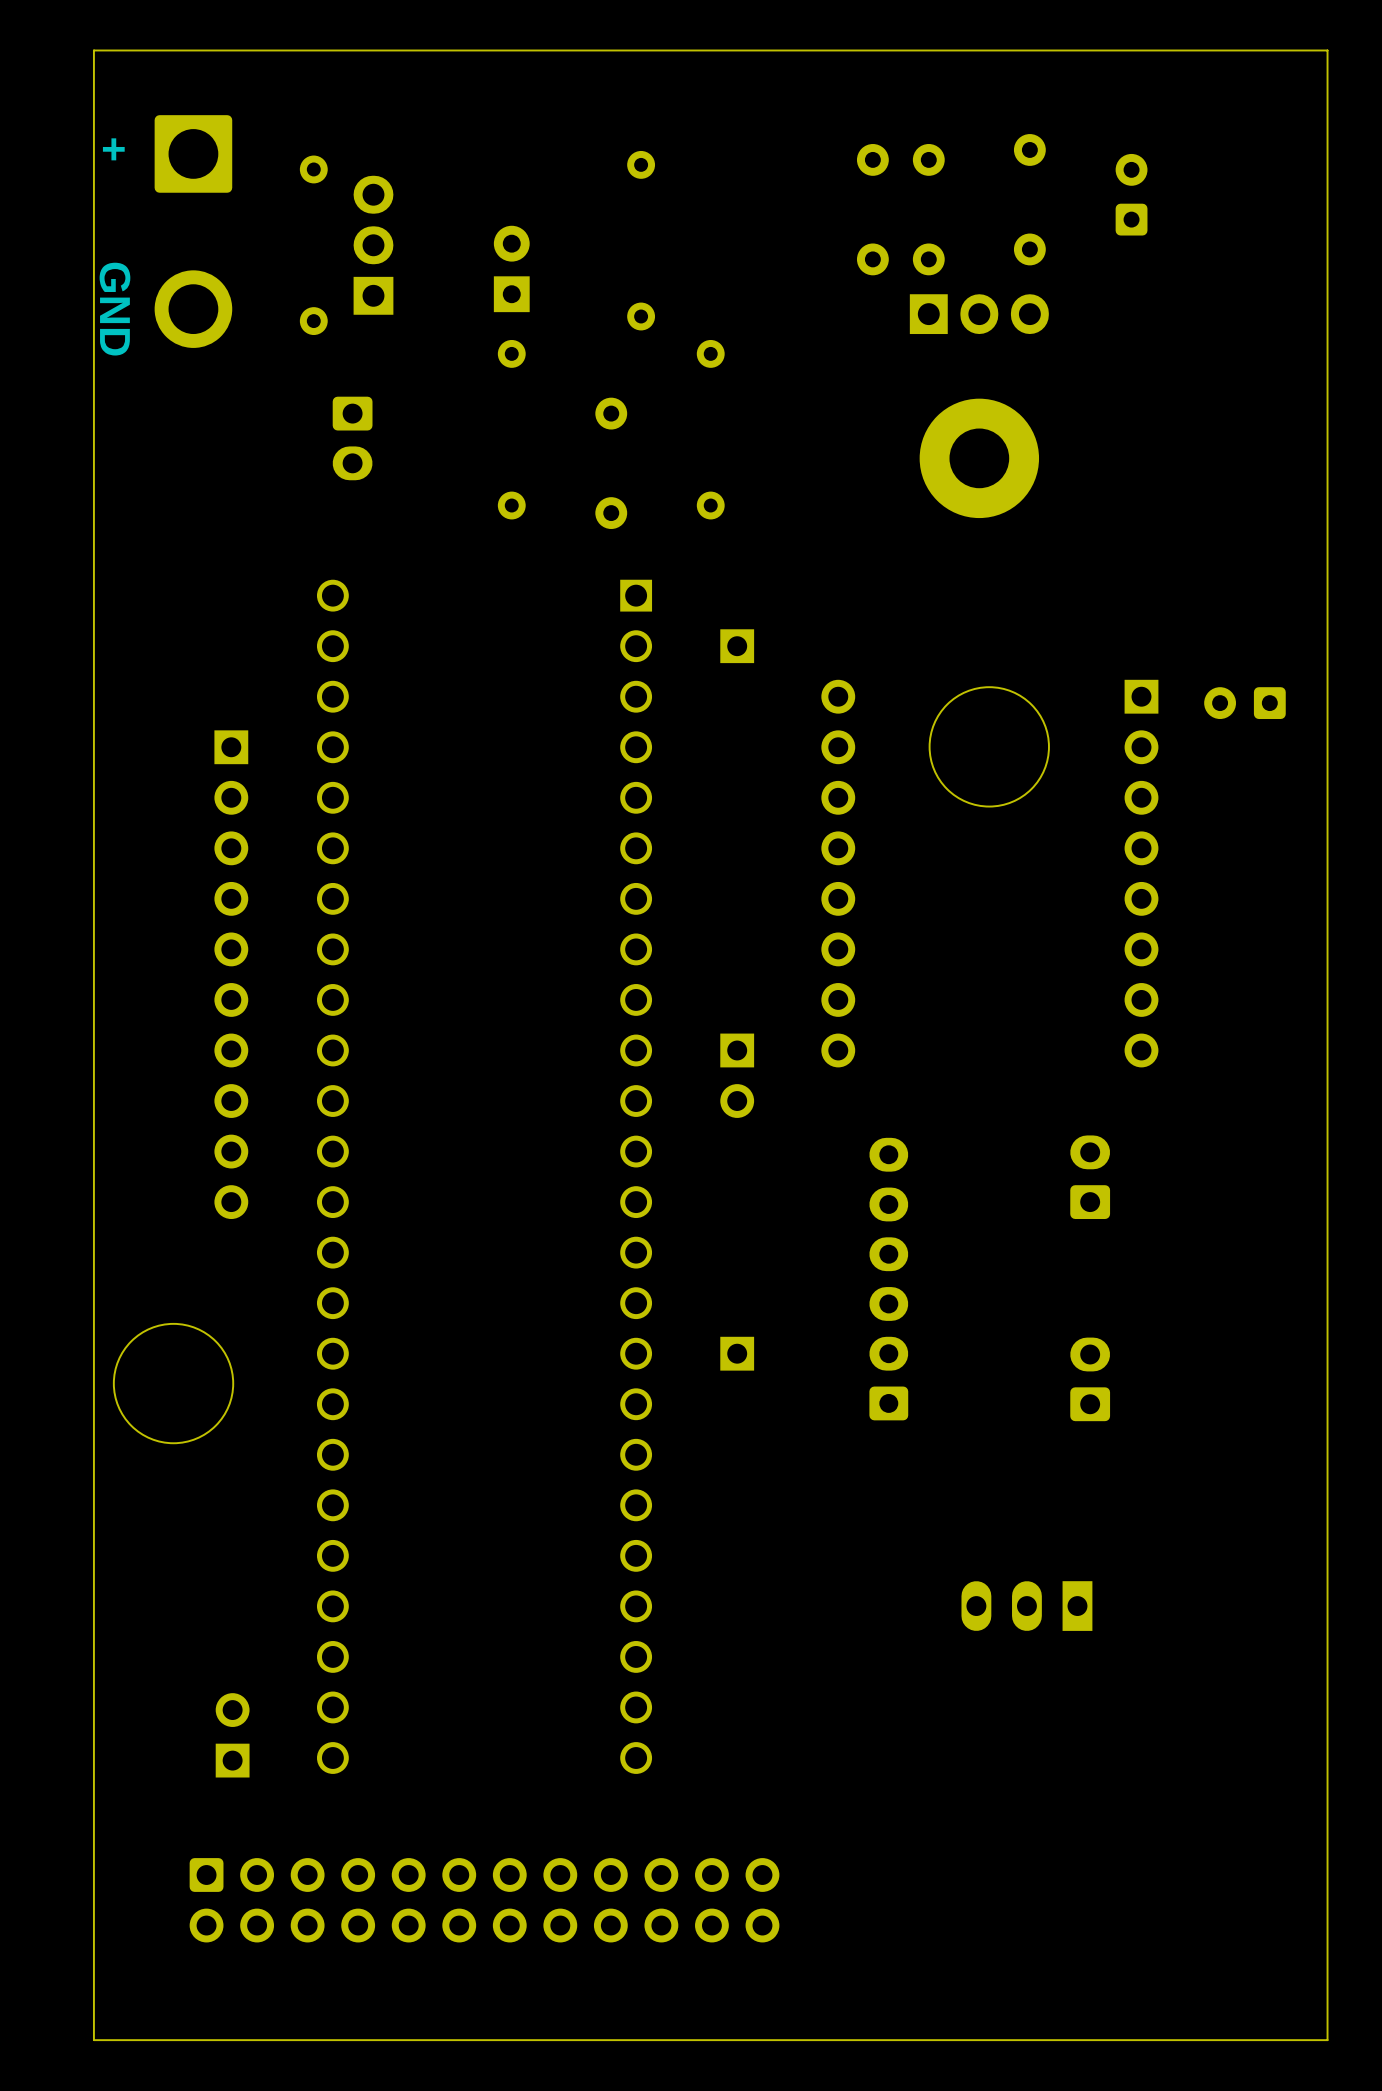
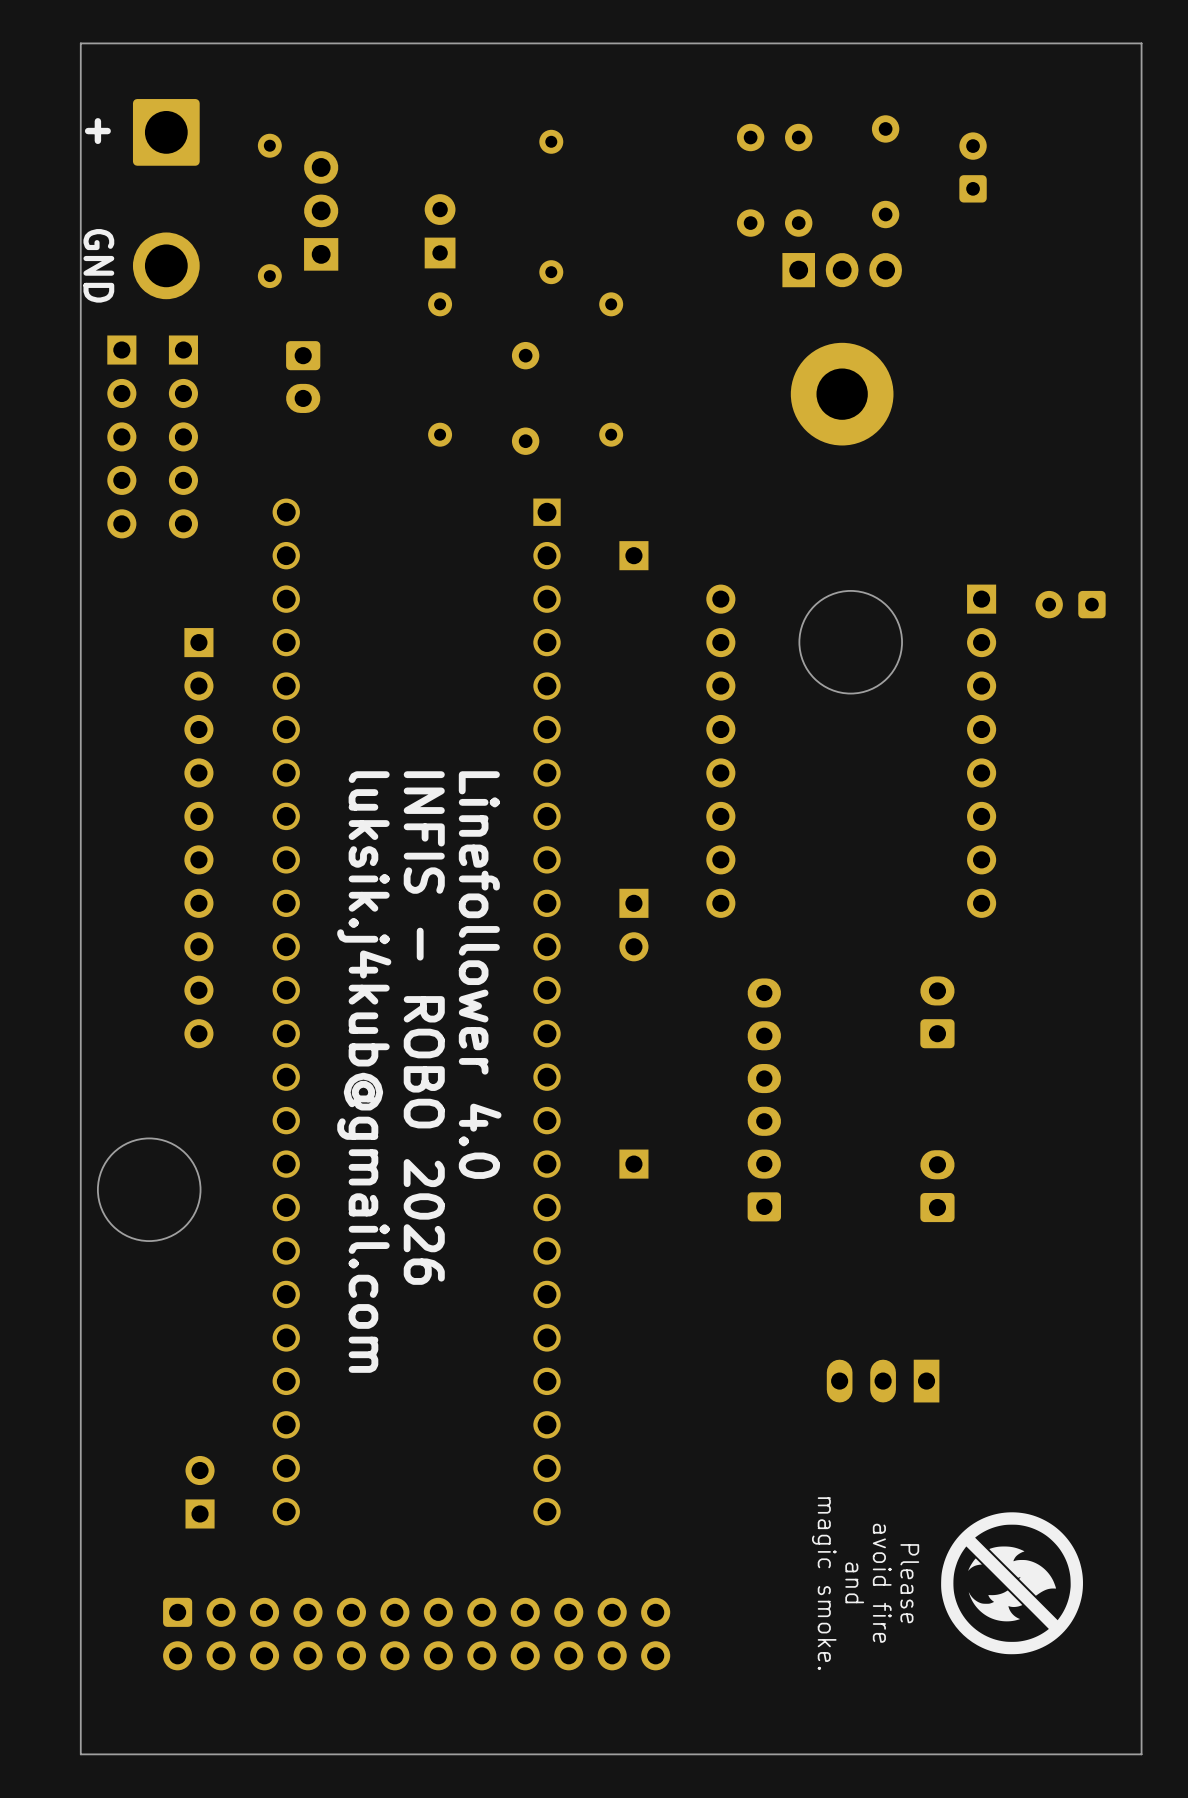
part: none -> (121, 436)
part: none -> (183, 436)
text: none -> Linefollower 4.0 (480, 975)
text: none -> INFIS - ROBO 2026 (424, 1028)
text: none -> luksik.j4kub@gmail.com (364, 1072)
drawing: none -> [941, 1512, 1083, 1655]
text: none -> magic smoke. (824, 1583)
text: none -> and (854, 1582)
text: none -> avoid fire (882, 1583)
text: none -> Please (909, 1583)

